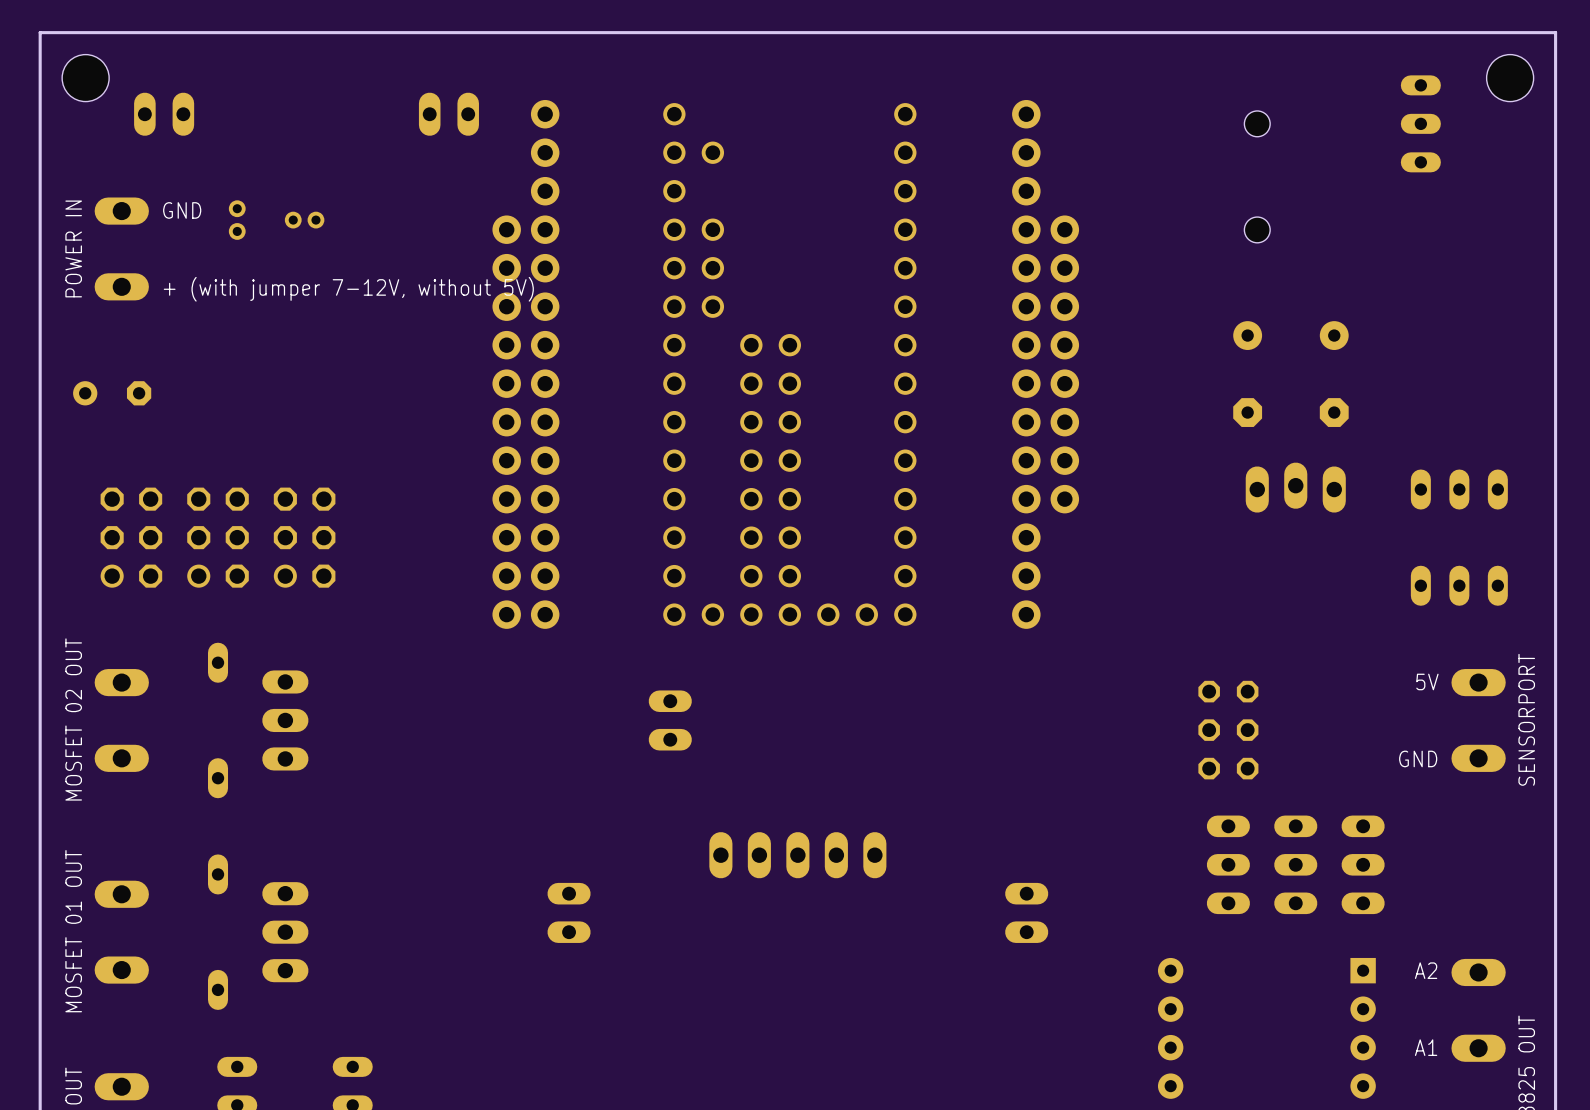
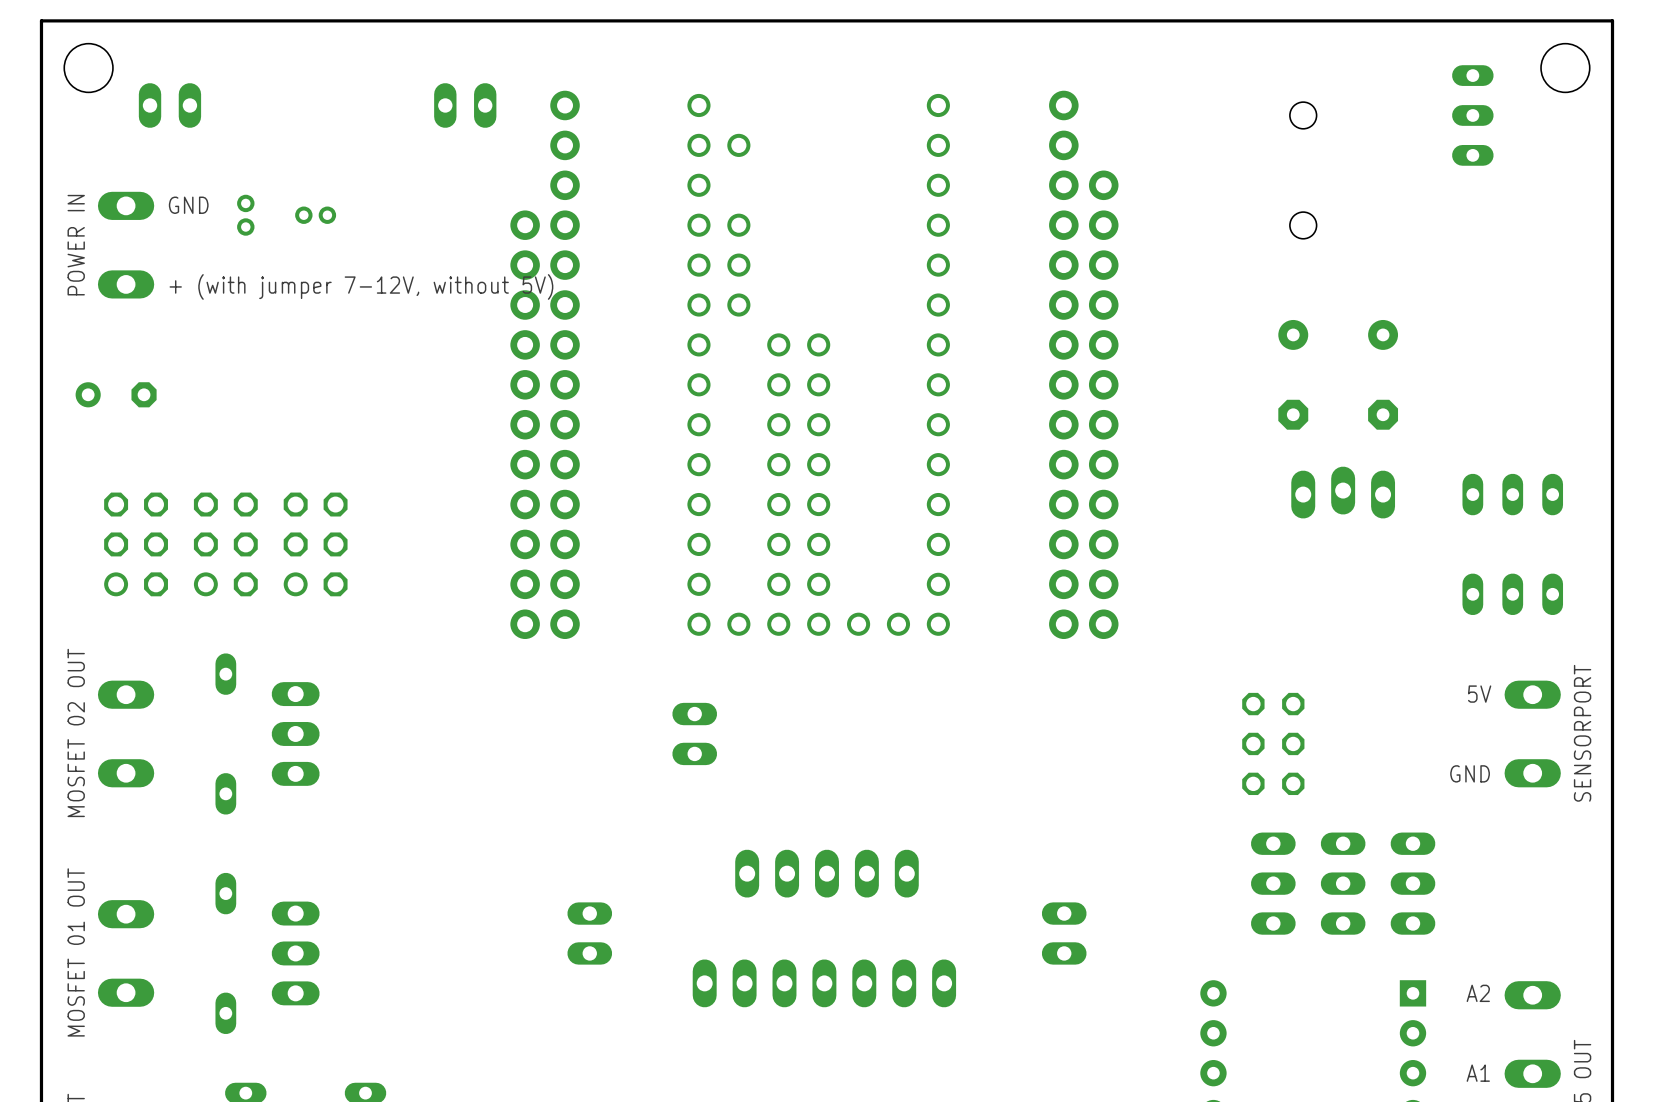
part: none -> (1103, 404)
part: none -> (824, 983)

